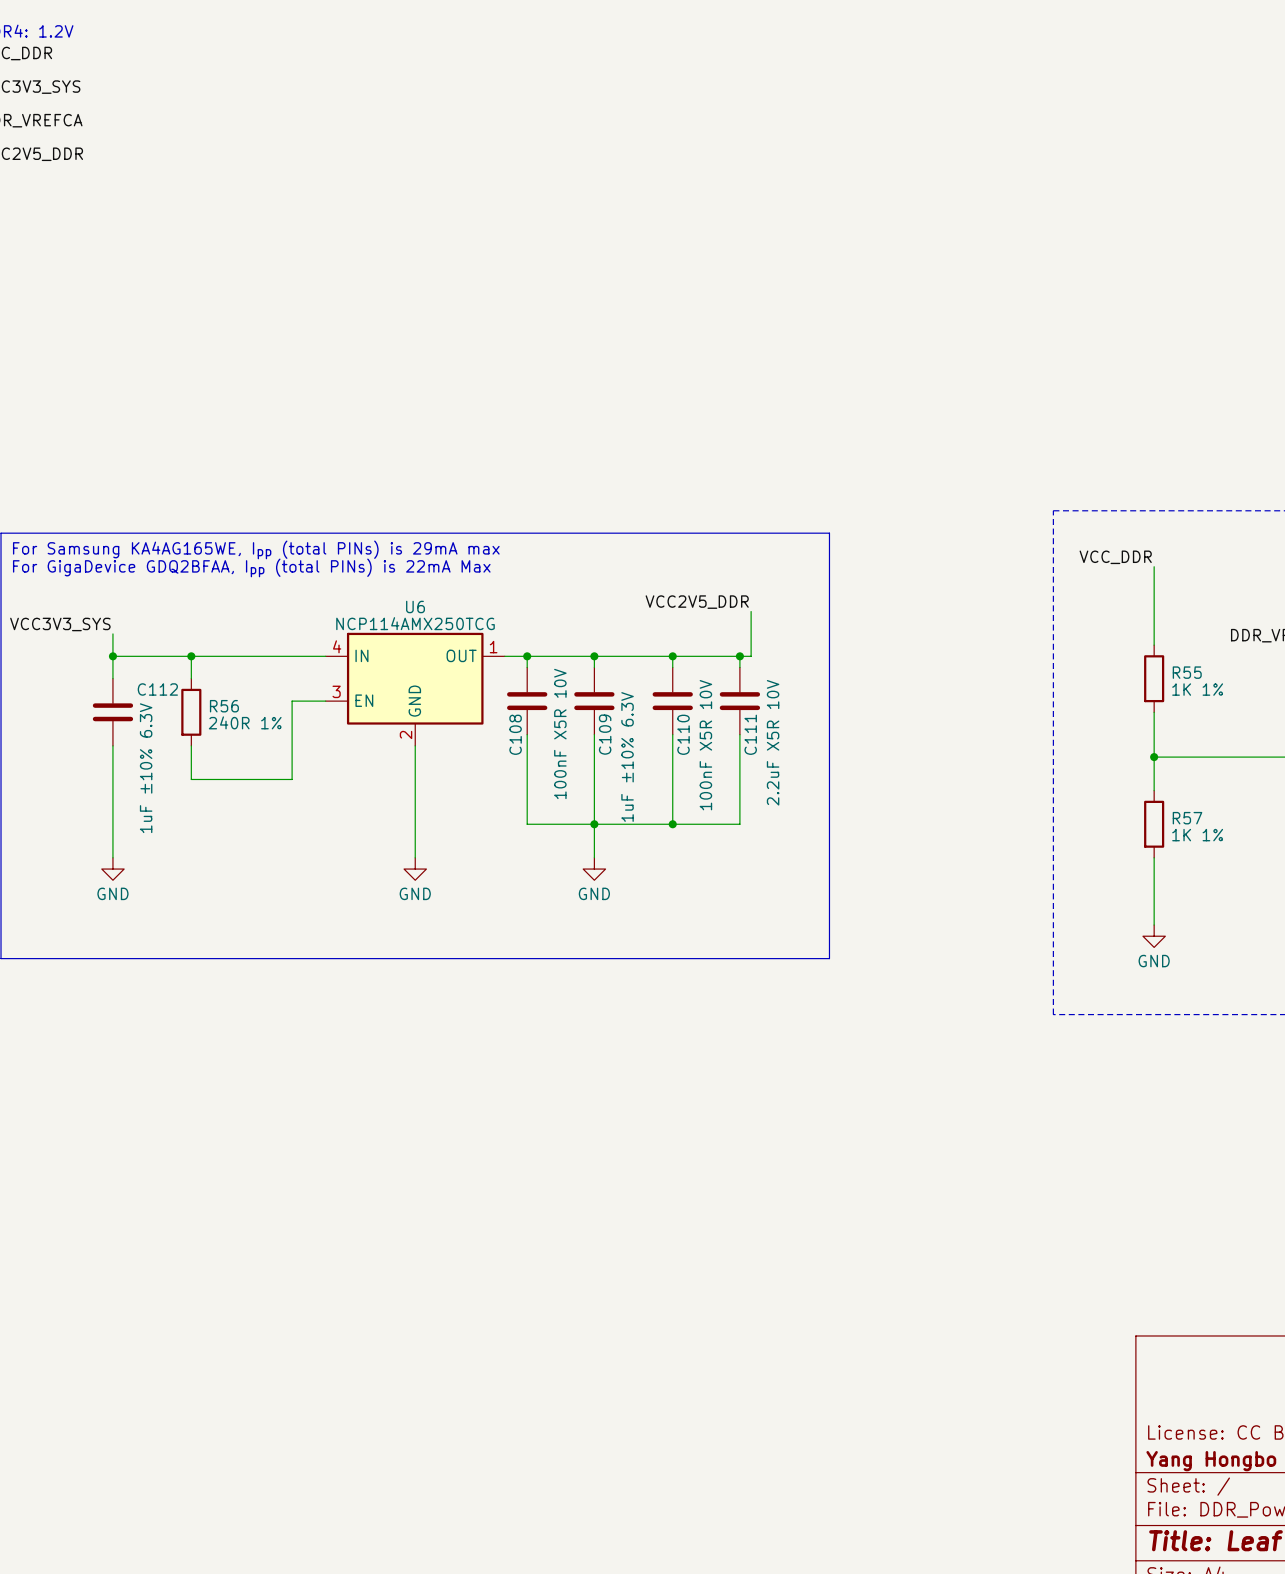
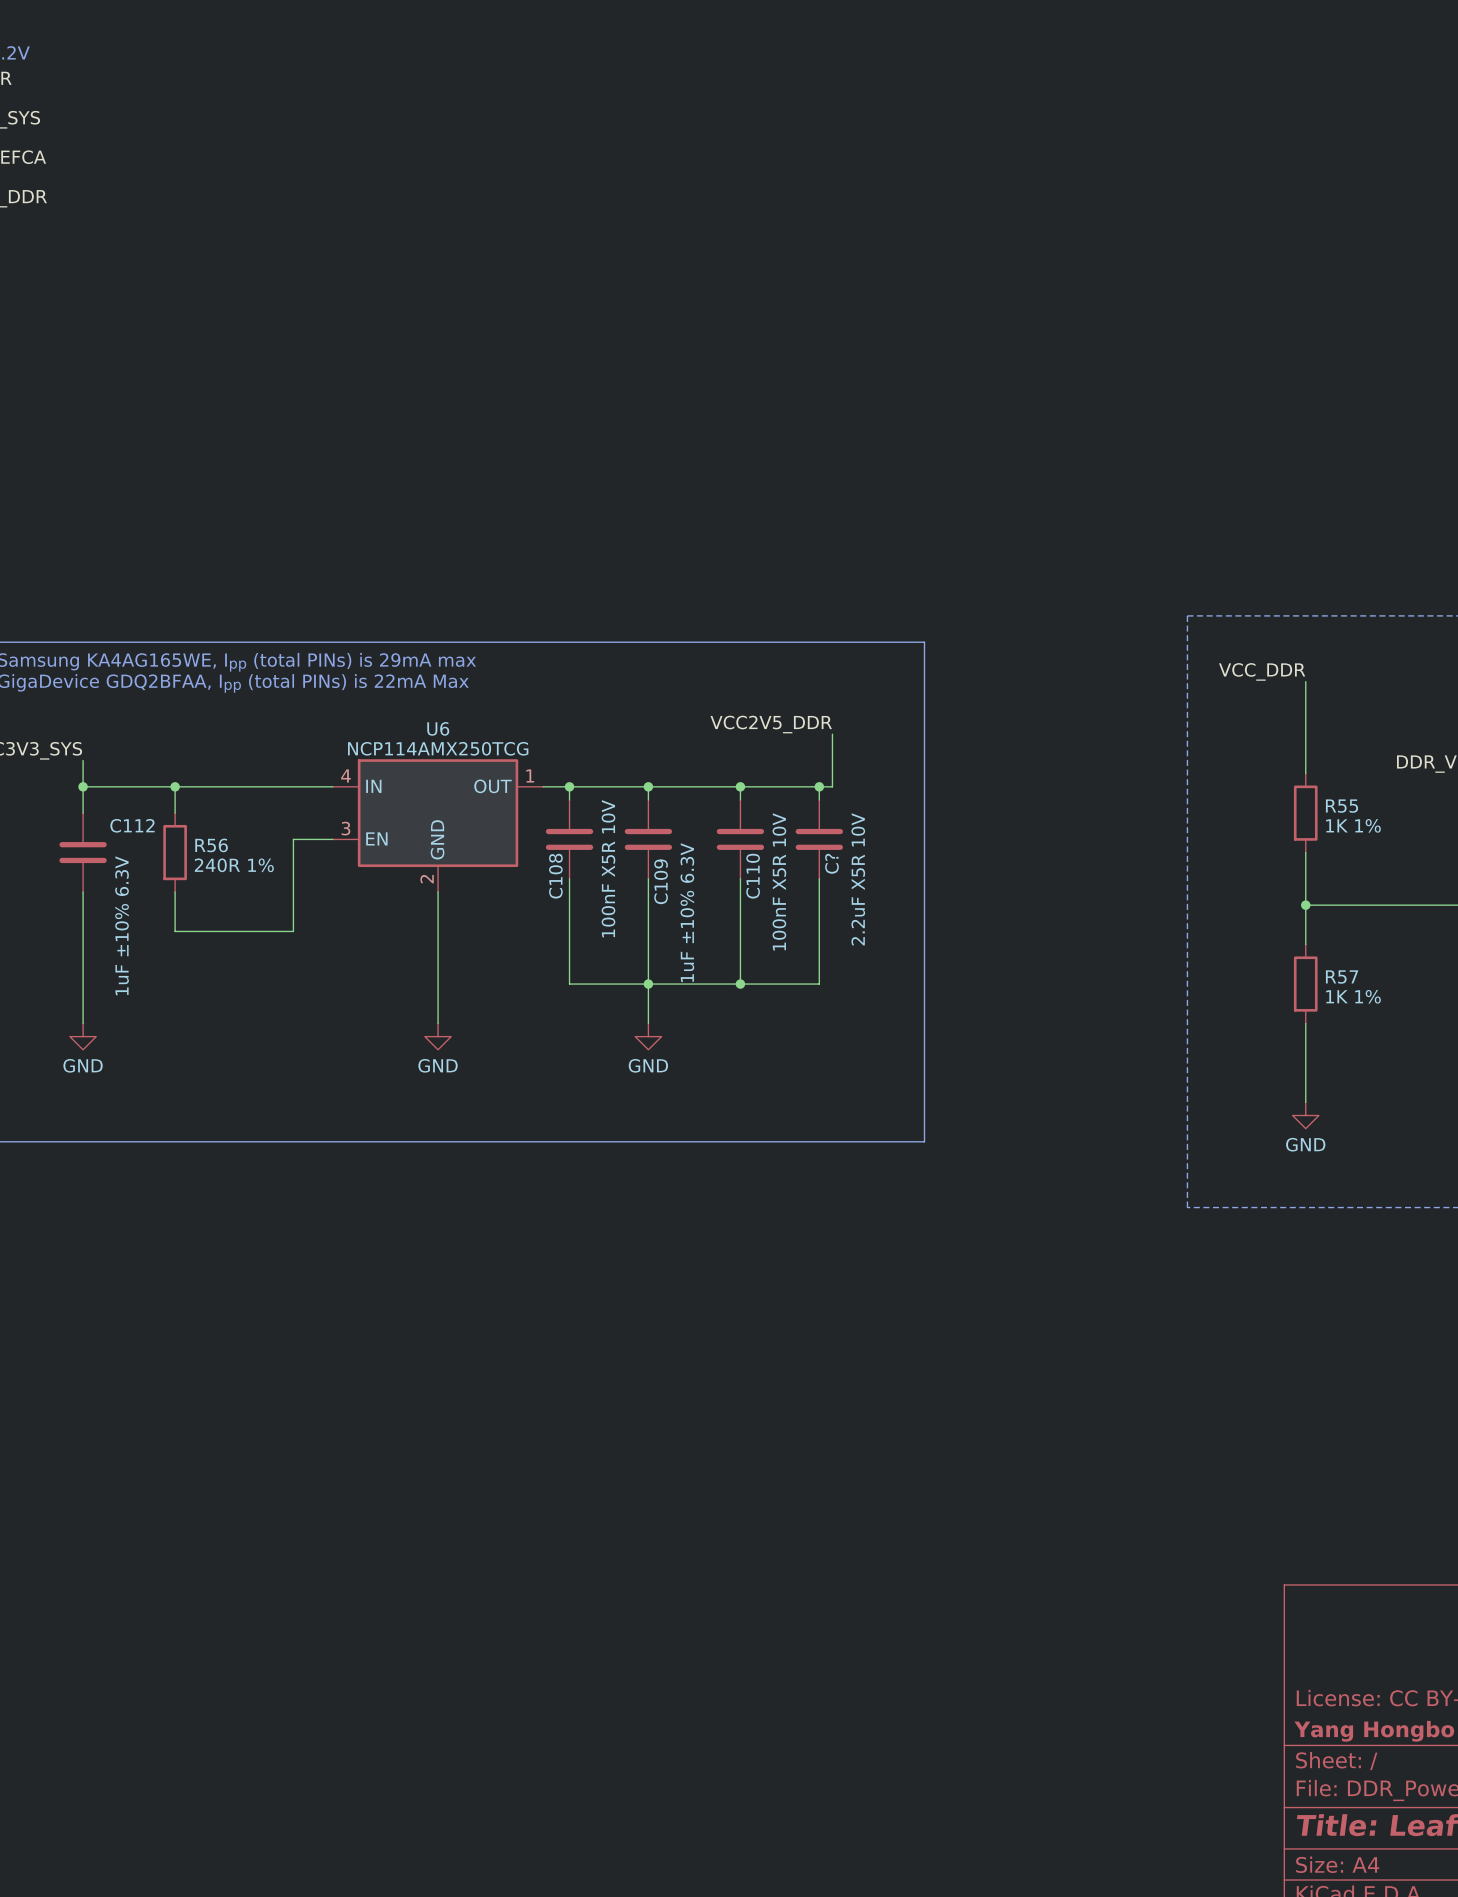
C111 name: C111 (750, 734) -> C? (831, 863)

